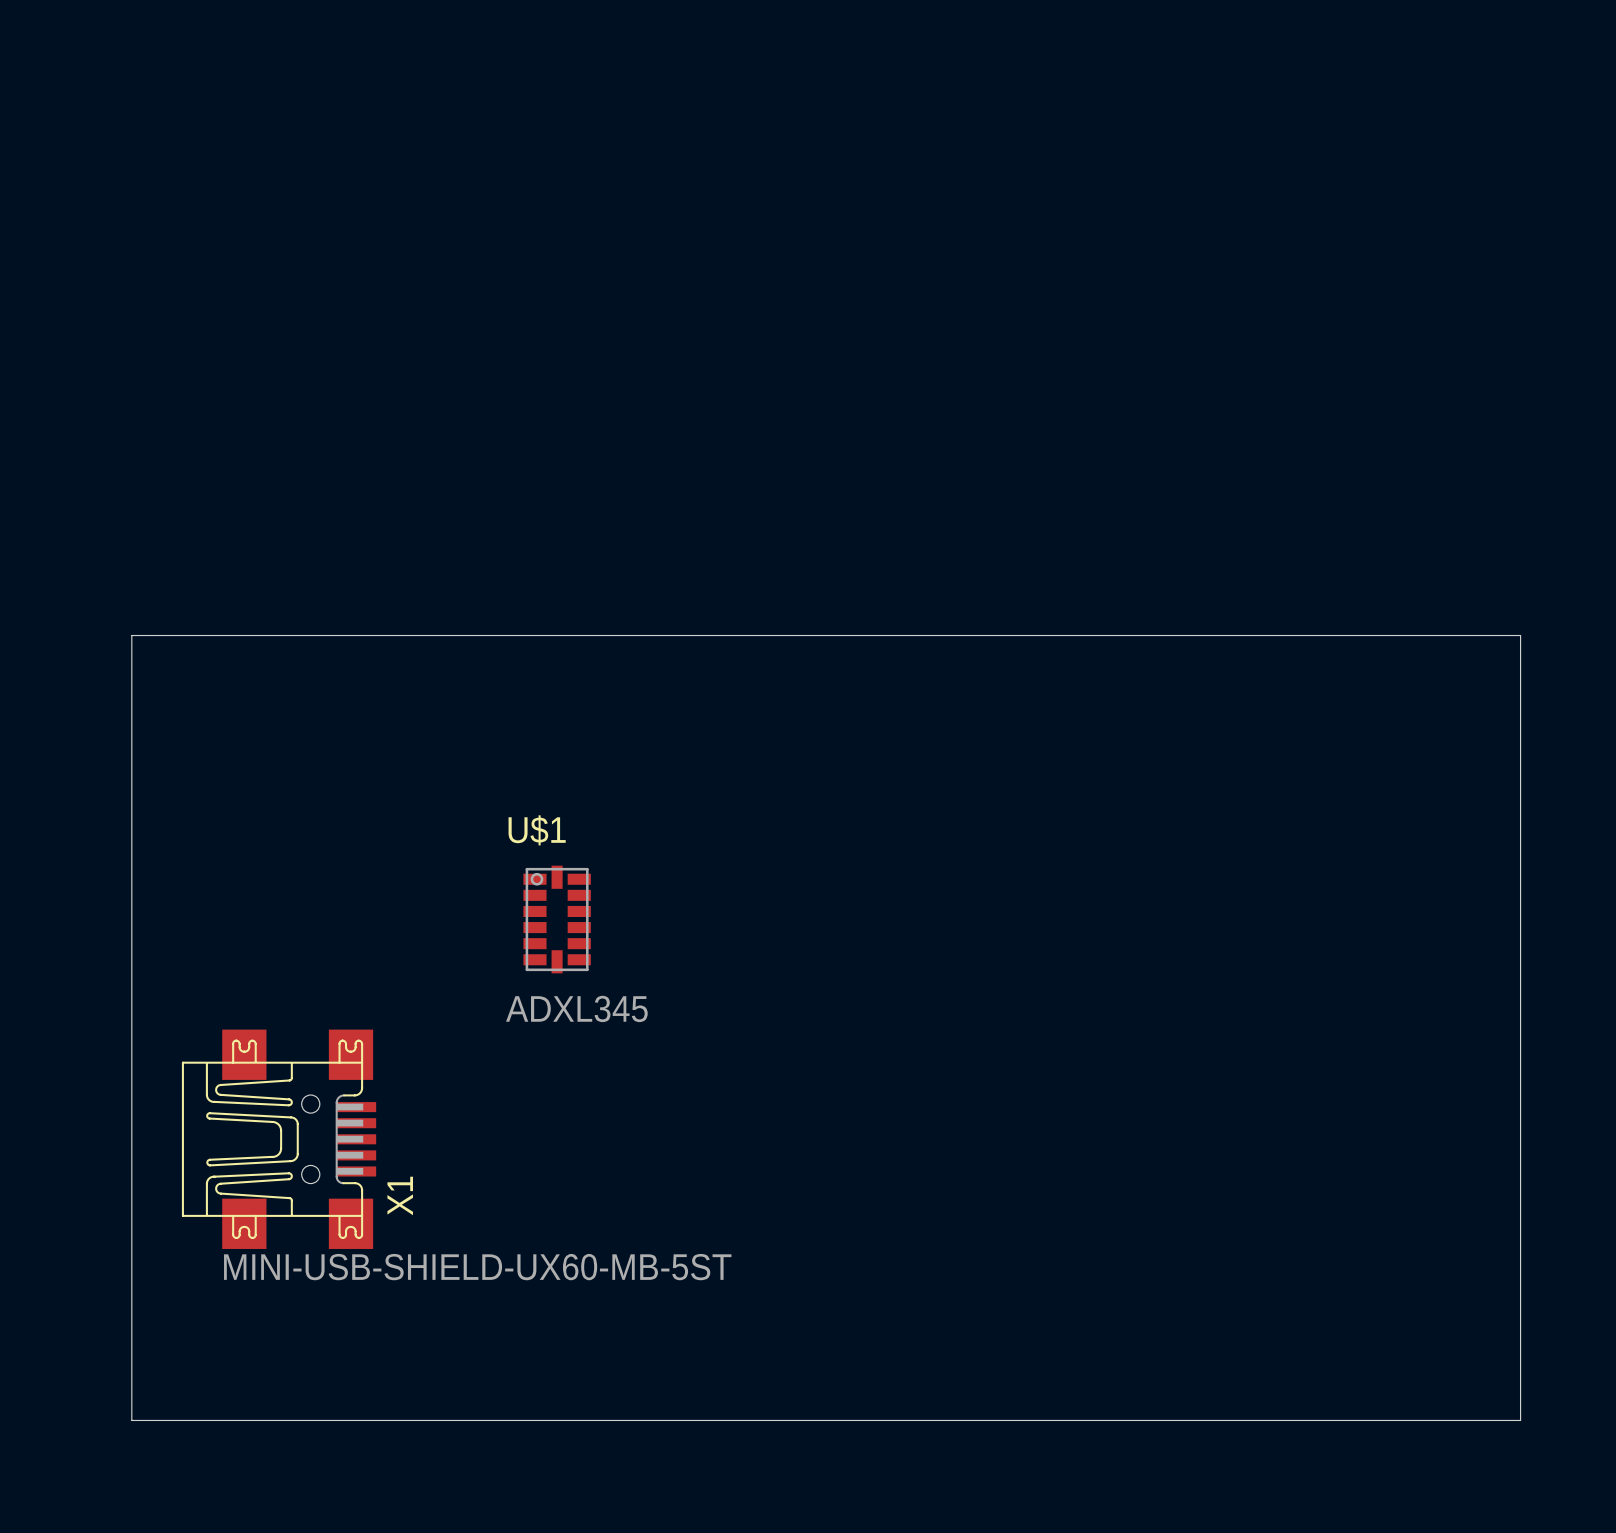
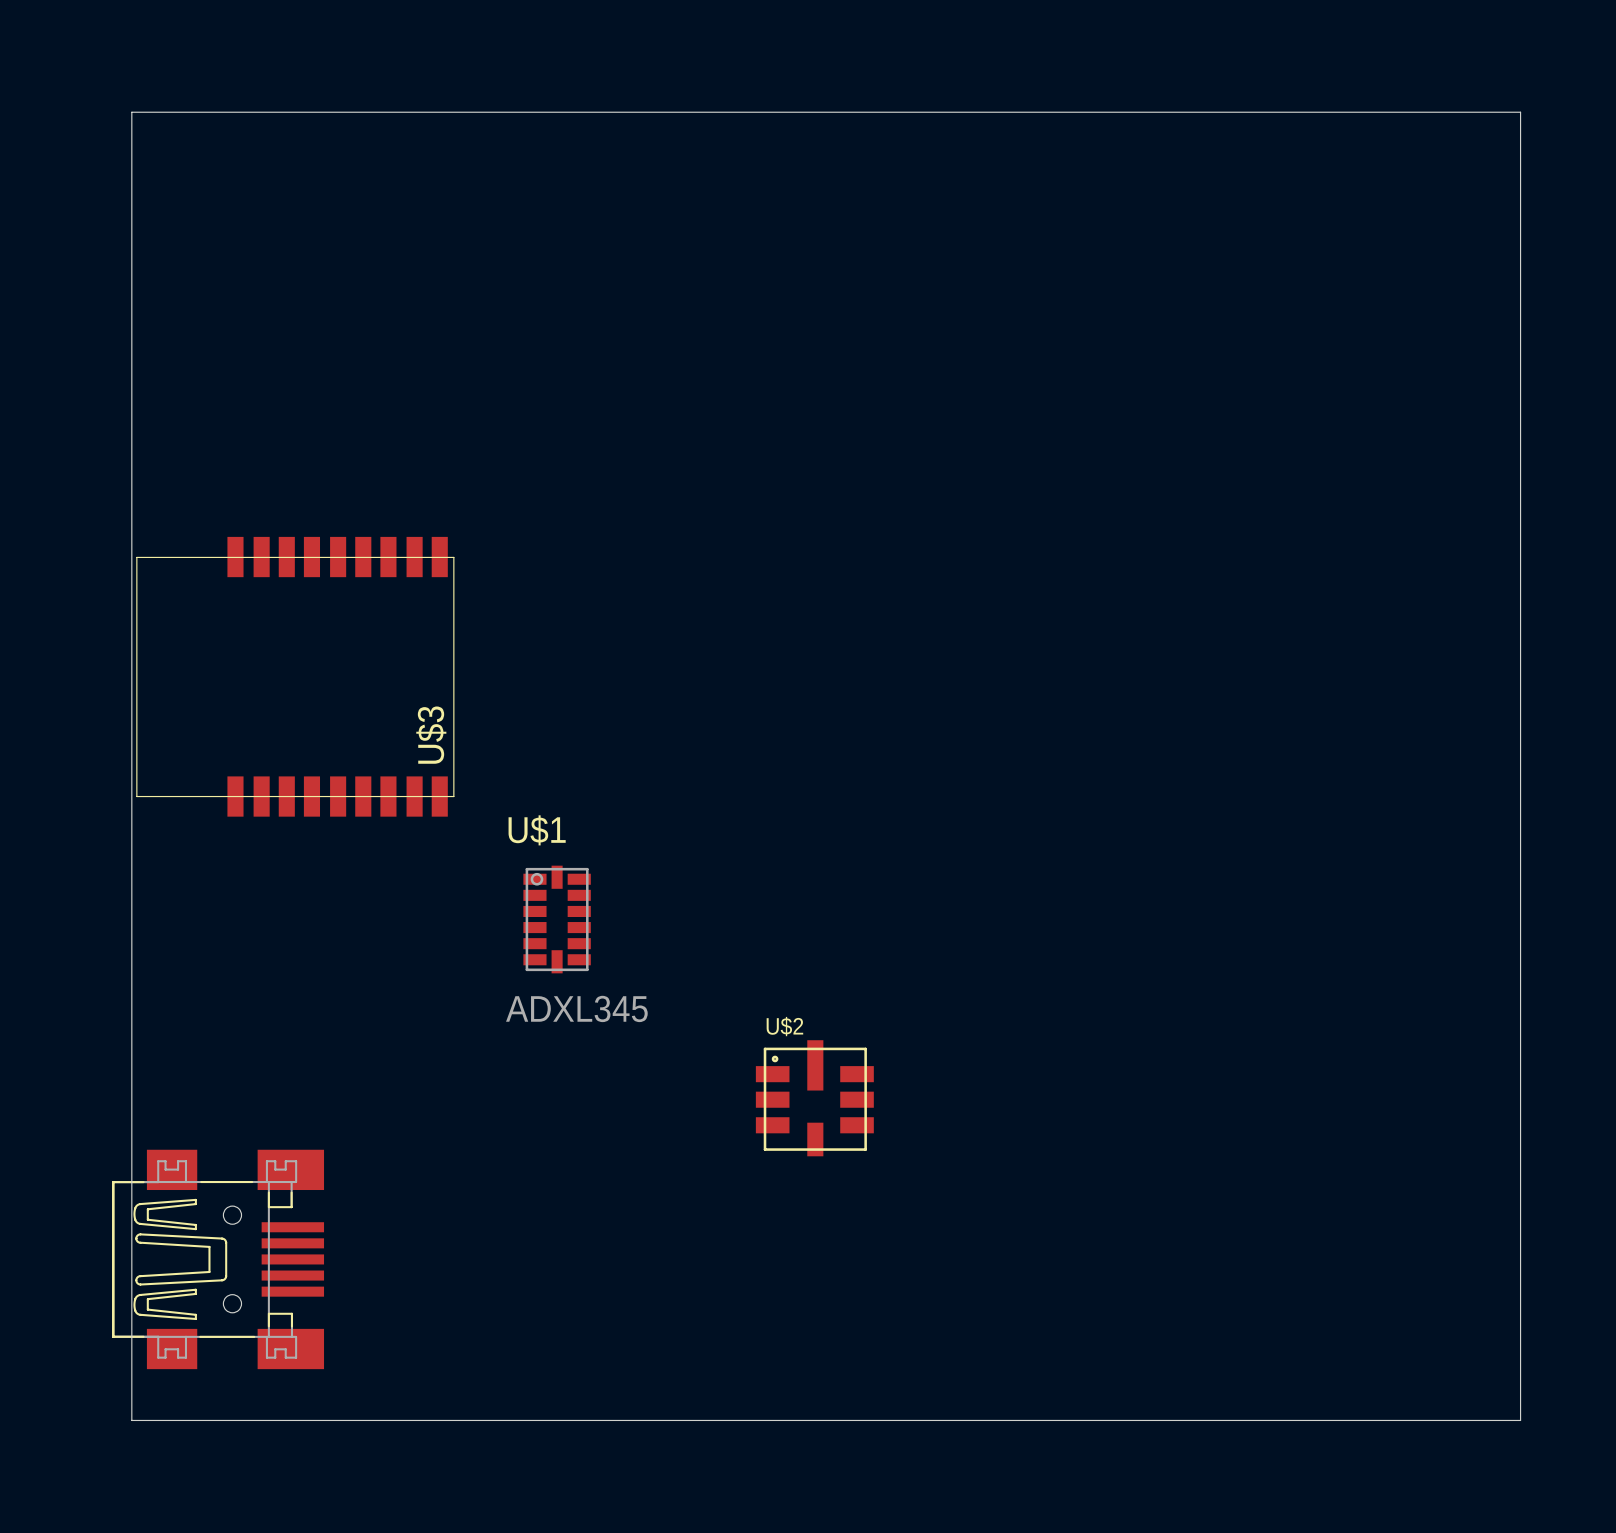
board edge: (131, 635) (1520, 635) -> (131, 635) (131, 112) (1520, 112) (1520, 635)
U$3: none -> (295, 676)
U$2: none -> (814, 1098)
X1: MINI-USB-SHIELD-UX60-MB-5ST (279, 1139) -> none
part: none -> (218, 1259)

